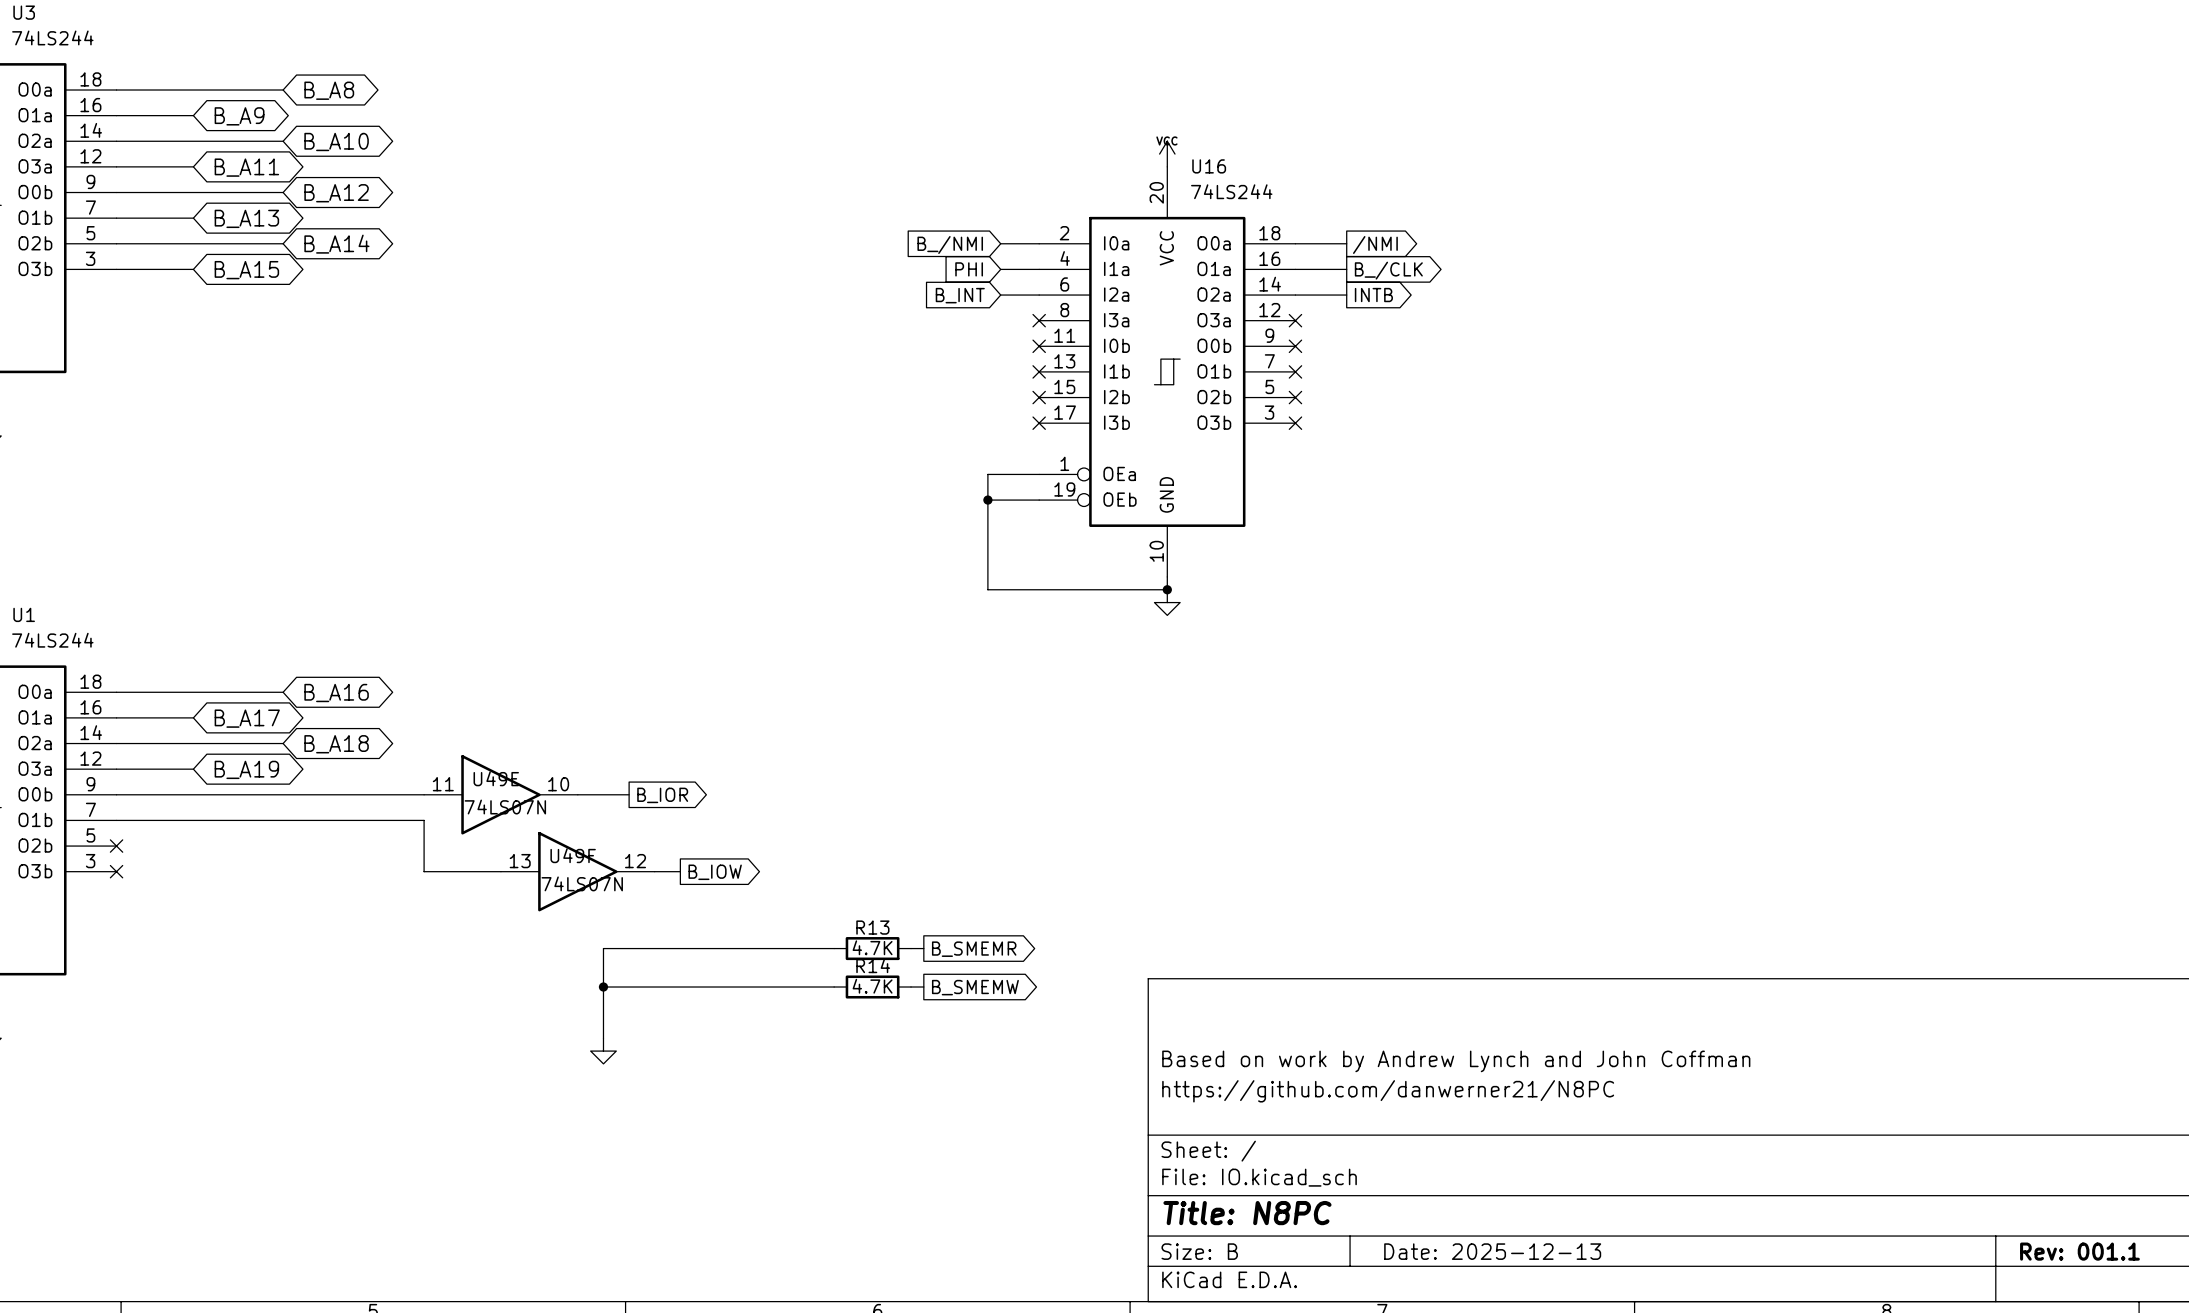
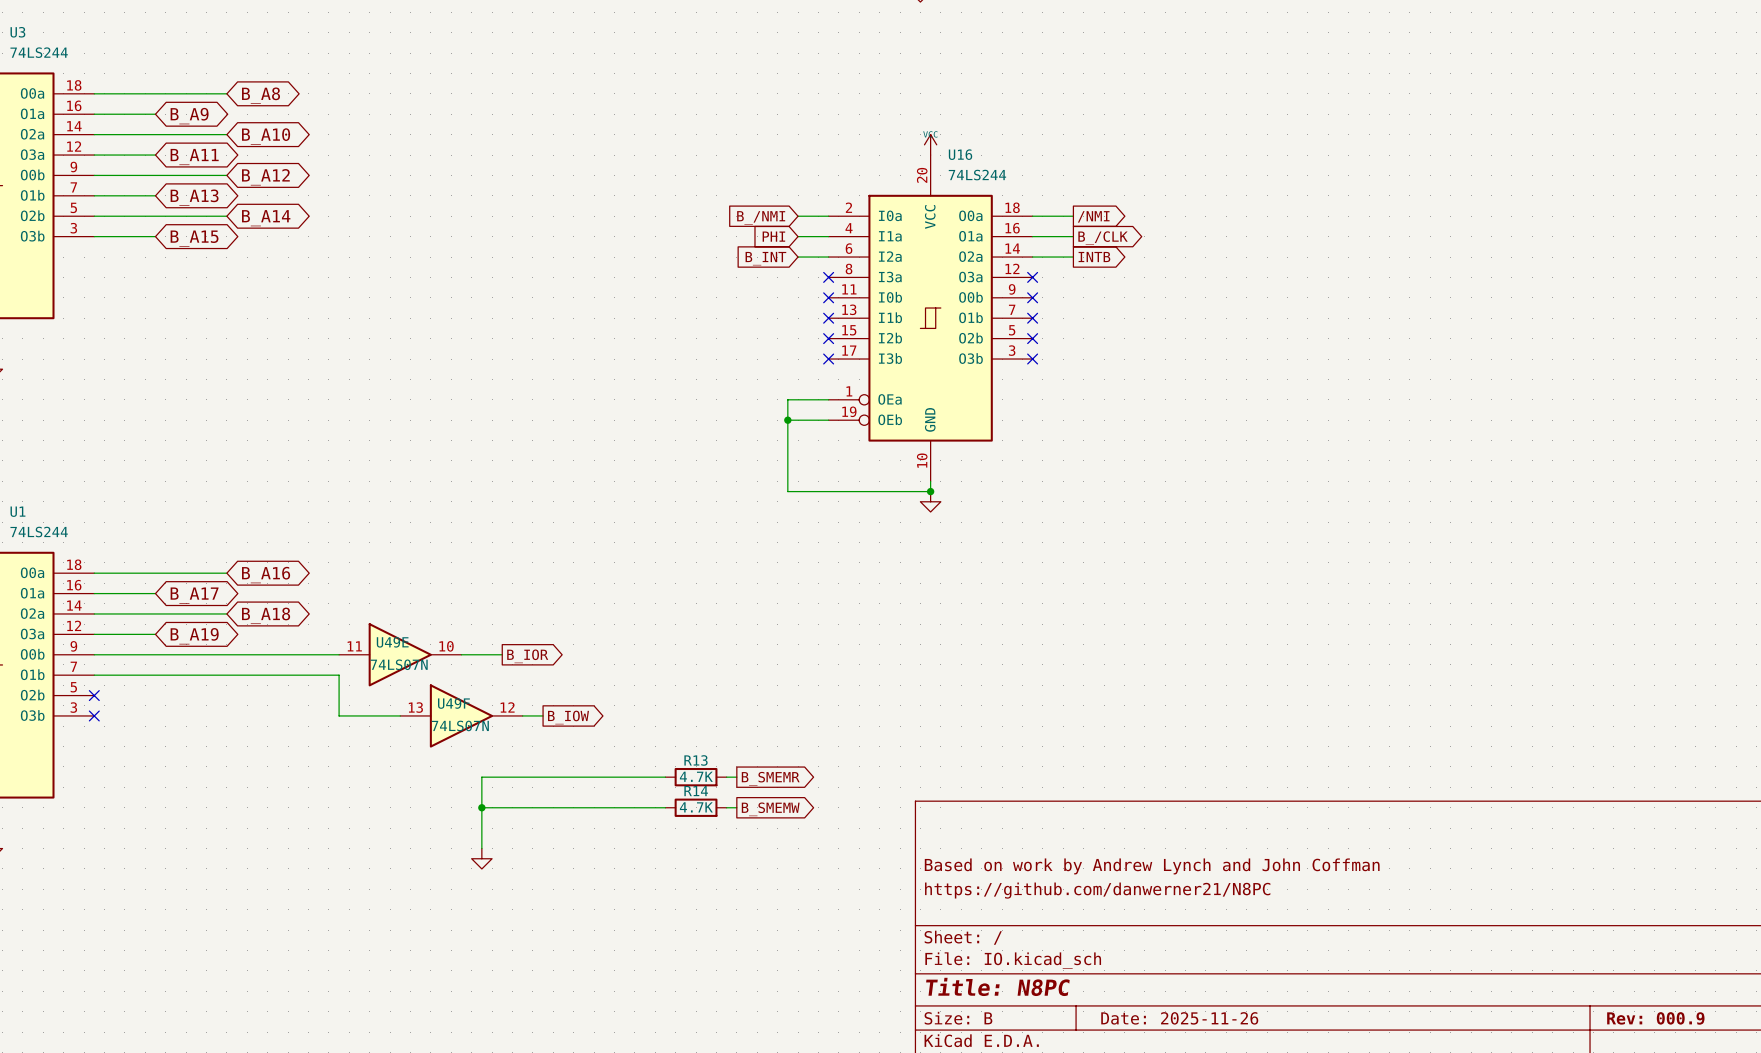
title block: Date: 2025-12-13 (1492, 1251) -> Date: 2025-11-26 (1179, 1018)
title block: Rev: 001.1 (2079, 1251) -> Rev: 000.9 (1655, 1018)

